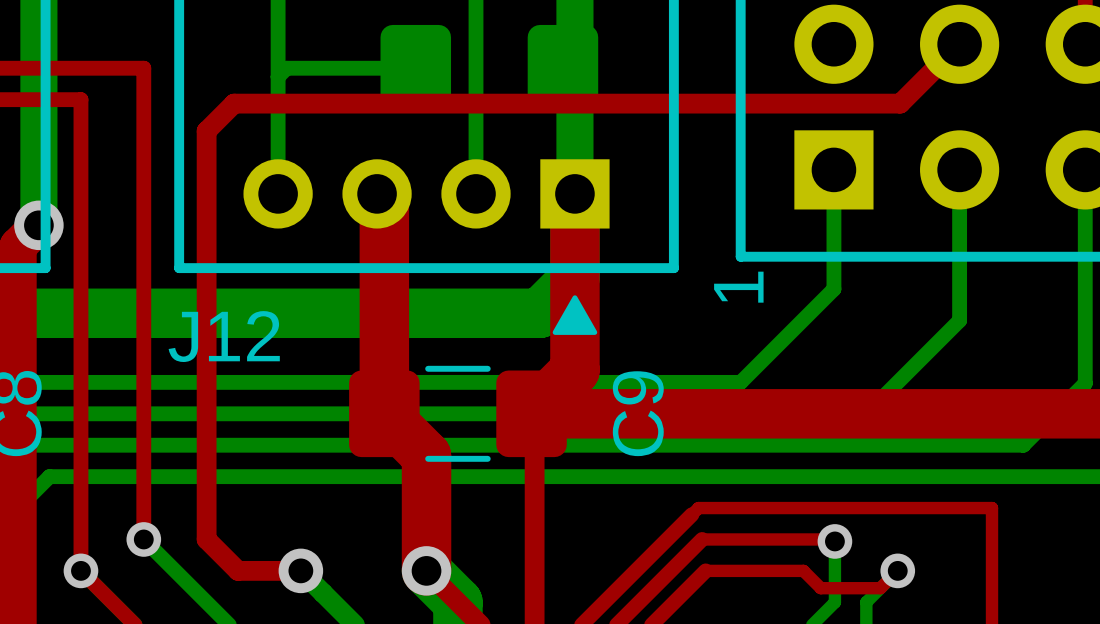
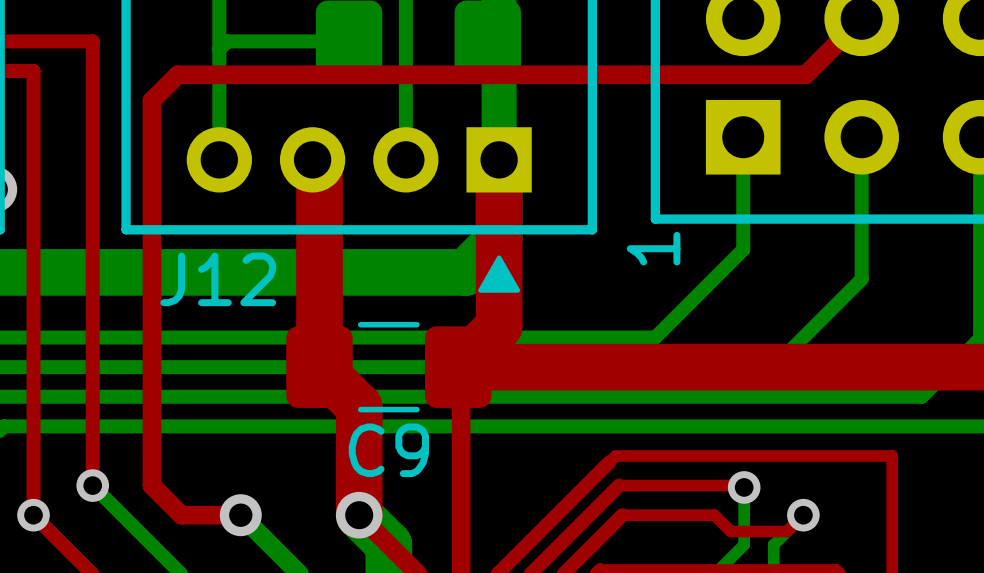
J12 name position: J12 (224, 336) -> J12 (218, 279)
C9 name rotation: 0° (638, 413) -> 90° clockwise (388, 450)
C9 name position: C9 (638, 413) -> C9 (388, 450)

